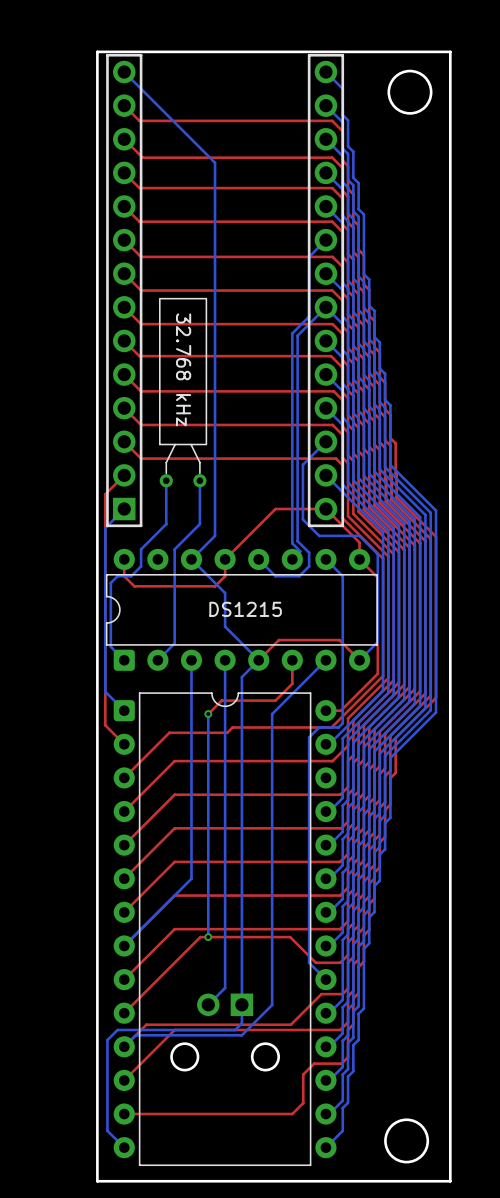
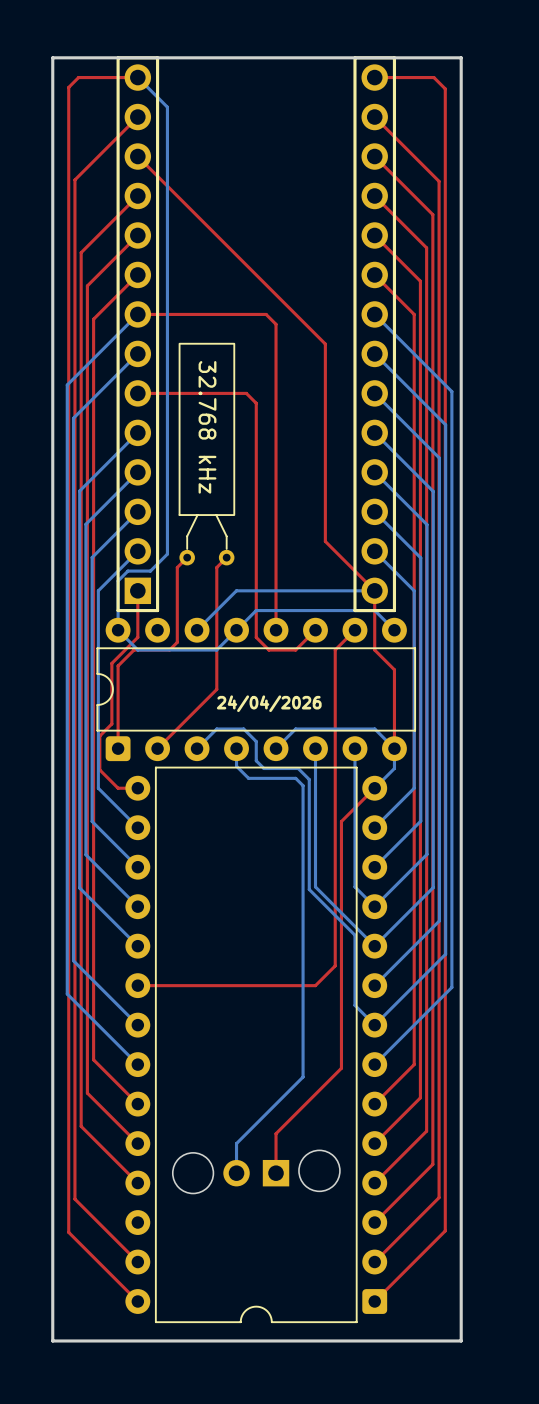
board edge: (450, 51) (97, 51) (97, 1181) (450, 1181) (450, 51) -> (461, 57) (461, 1340) (52, 1340) (52, 57) (461, 57)
round board edge: [387, 69, 433, 115] -> none
bottom track: (325, 72) (342, 88) (342, 114) (348, 120) (348, 146) (353, 151) (353, 177) (358, 183) (358, 209) (363, 214) (363, 274) (369, 279) (369, 305) (374, 310) (374, 337) (379, 342) (379, 368) (385, 373) (385, 399) (390, 405) (390, 464) (436, 510) (436, 712) (390, 758) (390, 817) (385, 823) (385, 849) (379, 854) (379, 880) (374, 885) (374, 912) (369, 917) (369, 943) (363, 948) (363, 1008) (358, 1013) (358, 1039) (353, 1045) (353, 1071) (348, 1076) (348, 1102) (342, 1108) (342, 1130) (325, 1147) -> none
top track: none -> (374, 77) (433, 77) (445, 88) (445, 555)
bottom track: (149, 97) (215, 162) (215, 535) (191, 559) (225, 593) (225, 626) (258, 660) (241, 677) (241, 1023) (235, 1030) (117, 1030) (107, 1040) (107, 1130) (124, 1147) -> (167, 107) (167, 554) (150, 571) (127, 571) (118, 580) (118, 630) (137, 650) (216, 650) (256, 610) (374, 610) (394, 630)
top track: (124, 105) (139, 120) (332, 120) (342, 131) (342, 160) (348, 165) (348, 188) (353, 194) (353, 220) (358, 225) (358, 249) (363, 255) (363, 284) (369, 289) (369, 315) (374, 321) (374, 347) (379, 352) (379, 377) (385, 382) (385, 409) (390, 414) (390, 438) (395, 443) (396, 497) (436, 536) (436, 697) (395, 738) (395, 772) (390, 778) (390, 804) (385, 809) (385, 837) (379, 842) (379, 867) (374, 872) (374, 898) (369, 903) (369, 930) (363, 935) (363, 961) (358, 966) (358, 993) (353, 998) (353, 1024) (348, 1029) (348, 1057) (341, 1063) (314, 1063) (303, 1074) (303, 1103) (292, 1114) (124, 1114) -> (137, 77) (78, 77) (68, 87) (68, 1232) (137, 1301)
bottom track: (325, 105) (342, 122) (342, 148) (348, 153) (348, 180) (353, 185) (353, 211) (358, 216) (358, 276) (363, 281) (363, 307) (369, 313) (369, 339) (374, 344) (374, 370) (379, 376) (379, 402) (385, 407) (385, 467) (430, 512) (430, 710) (385, 755) (385, 815) (379, 820) (379, 847) (374, 852) (374, 878) (369, 883) (369, 909) (363, 915) (363, 941) (358, 946) (358, 1006) (353, 1011) (353, 1037) (348, 1043) (348, 1069) (342, 1074) (342, 1100) (329, 1114) -> none
top track: none -> (374, 117) (439, 181) (439, 1197) (374, 1262)
bottom track: (325, 139) (342, 156) (342, 182) (348, 187) (348, 213) (353, 218) (353, 278) (358, 283) (358, 310) (363, 315) (363, 341) (369, 346) (369, 372) (374, 378) (374, 404) (379, 409) (379, 469) (425, 515) (425, 708) (379, 753) (379, 813) (374, 818) (374, 844) (369, 850) (369, 876) (363, 881) (363, 907) (358, 912) (358, 939) (353, 944) (353, 1004) (348, 1009) (348, 1035) (342, 1040) (342, 1066) (329, 1080) -> none
top track: none -> (374, 156) (432, 214) (432, 1164) (374, 1222)
top track: (142, 157) (332, 157) (342, 168) (342, 191) (348, 196) (348, 222) (353, 227) (353, 252) (358, 257) (358, 286) (363, 292) (363, 317) (369, 323) (369, 349) (374, 354) (374, 379) (379, 384) (379, 411) (385, 416) (385, 440) (390, 445) (391, 499) (430, 538) (430, 695) (390, 736) (390, 770) (385, 776) (385, 802) (379, 807) (379, 834) (374, 840) (374, 865) (369, 870) (369, 896) (363, 901) (363, 927) (358, 933) (358, 959) (353, 964) (353, 990) (348, 996) (348, 1022) (340, 1030) (174, 1030) (124, 1080) -> (137, 117) (74, 179) (74, 1199) (137, 1262)
top track: none -> (159, 178) (325, 344) (325, 541) (374, 590) (374, 650) (394, 669) (394, 748)
top track: (124, 172) (139, 188) (332, 188) (342, 198) (342, 224) (348, 230) (348, 254) (353, 259) (353, 288) (358, 294) (358, 320) (363, 325) (363, 351) (369, 356) (369, 381) (374, 387) (374, 413) (379, 419) (379, 442) (385, 447) (386, 479) -> none
bottom track: (325, 172) (342, 189) (342, 215) (348, 221) (348, 280) (353, 286) (353, 312) (358, 317) (358, 343) (363, 348) (363, 375) (369, 380) (369, 406) (374, 411) (374, 471) (420, 517) (420, 705) (374, 751) (374, 811) (369, 816) (369, 842) (363, 847) (363, 874) (358, 879) (358, 905) (353, 910) (353, 936) (348, 942) (348, 1001) (342, 1007) (342, 1033) (329, 1046) -> none
top track: none -> (374, 196) (426, 247) (426, 1131) (374, 1183)
top track: (124, 206) (139, 221) (332, 221) (342, 232) (342, 256) -> (374, 274) (394, 294)
bottom track: (325, 206) (342, 223) (342, 283) (348, 288) (348, 314) (353, 319) (353, 345) (358, 351) (358, 377) (363, 382) (363, 408) (369, 414) (369, 473) (414, 519) (414, 703) (369, 749) (369, 809) (363, 814) (363, 840) (358, 845) (358, 871) (353, 877) (353, 903) (348, 908) (348, 934) (342, 940) (342, 999) (329, 1013) -> none
top track: none -> (374, 235) (420, 281) (420, 1097) (374, 1143)
top track: (124, 240) (141, 256) (332, 256) (342, 267) (342, 293) (348, 298) (348, 324) (353, 329) (353, 355) (358, 361) (358, 386) (363, 391) (363, 418) (369, 423) (369, 446) (374, 452) (374, 505) (414, 545) (414, 689) (374, 729) (374, 764) (369, 769) (369, 795) (363, 801) (363, 828) (358, 833) (358, 858) (353, 863) (353, 889) (348, 895) (348, 921) (340, 929) (174, 929) (124, 979) -> (137, 235) (87, 285) (87, 1093) (137, 1143)
bottom track: (325, 240) (309, 256) (309, 316) (292, 333) (292, 543) (300, 551) (292, 559) -> none
top track: (348, 262) (348, 291) (353, 296) (353, 322) (358, 327) (358, 353) (363, 359) (363, 384) (369, 389) (369, 416) (374, 421) (374, 444) (379, 449) (379, 502) (420, 543) (420, 691) (379, 731) (379, 766) (374, 771) (374, 798) (369, 803) (369, 830) (363, 835) (363, 860) (358, 865) (358, 892) (353, 897) (353, 923) (348, 928) (348, 955) (340, 962) (315, 962) (290, 937) (200, 937) (124, 1013) -> (137, 196) (81, 252) (81, 1126) (137, 1183)
bottom track: none -> (137, 314) (67, 385) (67, 994) (137, 1064)
top track: (124, 273) (141, 290) (332, 290) (342, 300) (342, 326) (348, 332) (348, 358) (353, 363) (353, 388) (358, 393) (358, 420) (363, 425) (363, 449) (369, 454) (369, 507) (409, 547) (409, 686) (369, 727) (369, 761) (363, 767) (363, 793) (358, 798) (358, 826) (353, 831) (353, 856) (348, 861) (348, 887) (340, 895) (174, 895) (124, 945) -> (137, 274) (93, 319) (93, 1059) (137, 1104)
top track: none -> (137, 314) (266, 314) (276, 324) (276, 630)
bottom track: (342, 290) (342, 316) (348, 321) (348, 348) (353, 353) (353, 379) (358, 384) (358, 410) (363, 416) (363, 475) (409, 521) (409, 701) (363, 747) (363, 806) (358, 812) (358, 838) (353, 843) (353, 869) (348, 874) (348, 901) (342, 906) (342, 932) (329, 945) -> (394, 334) (451, 391) (451, 987) (374, 1064)
bottom track: none -> (137, 353) (73, 418) (73, 960) (137, 1025)
top track: (124, 307) (141, 324) (332, 324) (342, 334) (342, 360) (348, 365) (348, 390) (353, 395) (353, 422) (358, 427) (358, 451) (363, 456) (363, 509) (404, 549) (404, 684) (363, 725) (363, 759) (358, 765) (358, 791) (353, 796) (353, 823) (348, 829) (348, 854) (340, 861) (174, 861) (124, 912) -> none
bottom track: (325, 307) (297, 335) (297, 541) (309, 552) (309, 566) (299, 576) (275, 576) (258, 559) -> none
bottom track: (342, 324) (342, 350) (348, 355) (348, 381) (353, 386) (353, 413) (358, 418) (358, 478) (404, 523) (404, 699) (358, 744) (358, 804) (353, 809) (353, 836) (348, 841) (348, 867) (342, 872) (342, 898) (329, 912) -> (394, 373) (445, 424) (445, 954) (374, 1025) (354, 1005)
top track: (124, 340) (139, 356) (331, 356) (342, 367) (342, 392) (348, 398) (348, 424) (353, 430) (353, 453) (358, 458) (358, 511) (398, 552) (398, 682) (358, 722) (358, 757) (353, 762) (353, 789) (348, 794) (348, 821) (341, 828) (174, 828) (124, 878) -> (137, 393) (246, 393) (256, 403) (256, 637) (268, 650) (295, 650) (315, 630)
bottom track: (342, 357) (342, 383) (348, 389) (348, 415) (353, 420) (353, 480) (398, 525) (398, 697) (353, 742) (353, 802) (348, 807) (348, 833) (342, 839) (342, 865) (329, 878) -> (394, 413) (439, 458) (439, 920) (374, 985)
bottom track: none -> (137, 432) (79, 491) (79, 888) (137, 946)
top track: (124, 374) (141, 391) (333, 391) (342, 400) (342, 426) (348, 432) (348, 455) (353, 460) (353, 513) (393, 554) (393, 680) (353, 720) (353, 755) (348, 760) (348, 787) (340, 794) (174, 794) (124, 845) -> none
bottom track: (342, 391) (342, 417) (348, 422) (348, 482) (393, 528) (393, 694) (348, 740) (348, 800) (342, 805) (342, 831) (329, 845) -> (394, 452) (433, 491) (433, 887) (374, 946) (315, 886) (315, 748)
bottom track: none -> (137, 472) (85, 524) (85, 854) (137, 906)
top track: (124, 408) (141, 424) (332, 424) (342, 435) (342, 457) (348, 463) (348, 516) (388, 556) (388, 678) (348, 718) (348, 745) (332, 761) (174, 761) (124, 811) -> none
bottom track: (342, 424) (342, 484) (388, 530) (388, 692) (342, 738) (342, 798) (329, 811) -> (394, 492) (427, 524) (427, 854) (374, 906) (354, 886)
bottom track: none -> (137, 511) (92, 557) (92, 821) (137, 867)
top track: (124, 441) (141, 458) (336, 458) (342, 465) (342, 518) (383, 558) (383, 676) (331, 727) (232, 727) (227, 732) (169, 732) (124, 777) -> none
bottom track: (325, 441) (302, 464) (302, 519) (319, 535) (359, 535) (377, 554) (377, 642) (359, 660) -> (374, 511) (420, 557) (420, 821) (374, 867)
top track: (124, 475) (105, 494) (105, 725) (124, 744) -> none
bottom track: (166, 480) (166, 524) (141, 549) (141, 566) (131, 576) (117, 576) (110, 582) (110, 646) (124, 660) -> none
top track: none -> (187, 557) (177, 567) (177, 642) (169, 650) (133, 650) (118, 665) (118, 748)
bottom track: (199, 480) (199, 524) (174, 549) (174, 643) (157, 660) -> none
top track: none -> (226, 557) (216, 567) (216, 689) (157, 748)
top track: (386, 501) (425, 541) (425, 693) (385, 733) (385, 768) (379, 773) (379, 800) (374, 805) (374, 832) (369, 837) (369, 862) (363, 868) (363, 894) (358, 899) (358, 925) (353, 930) (353, 957) (348, 962) (348, 988) (342, 994) (321, 994) (290, 1024) (146, 1024) (124, 1046) -> (445, 582) (445, 1230) (374, 1301)
bottom track: (124, 509) (105, 527) (105, 691) -> (137, 551) (98, 590) (98, 788) (115, 805)
top track: none -> (137, 590) (137, 637) (111, 663) (111, 723) (99, 736) (99, 769) (118, 788) (137, 788)
bottom track: none -> (374, 590) (236, 590) (197, 630)
bottom track: (359, 509) (383, 532) (383, 690) (329, 744) -> (414, 590) (414, 788) (374, 827)
top track: none -> (354, 630) (335, 649) (335, 768)
top track: (359, 542) (325, 509) (275, 509) (225, 559) (225, 576) (215, 586) (134, 586) (124, 576) (124, 559) -> (414, 630) (414, 314) (400, 300)
bottom track: (325, 559) (342, 576) (342, 643) -> (276, 748) (295, 729) (374, 729) (394, 748)
top track: (359, 559) (377, 577) (377, 673) (340, 710) (325, 710) -> (414, 650) (414, 1064) (374, 1104)
part: none -> (256, 689)
text: none -> 24/04/2026 (269, 703)
DS1215: (241, 609) -> none
bottom track: (191, 660) (191, 878) (124, 945) -> none
bottom track: (225, 660) (225, 987) (208, 1004) -> (236, 748) (236, 766) (248, 778) (295, 778) (303, 785) (303, 1077) (236, 1143) (236, 1173)
bottom track: (325, 660) (272, 714) (272, 1004) (241, 1035) (135, 1035) (124, 1046) -> none
bottom track: (342, 660) (342, 723) (338, 727) (319, 727) (309, 737) -> (354, 748) (354, 859)
bottom track: none -> (394, 768) (374, 788)
top track: (359, 660) (339, 640) (278, 640) (258, 660) -> none
top track: none -> (374, 788) (341, 821) (341, 1068) (276, 1133) (276, 1173)
top track: (292, 683) (275, 700) (221, 700) (208, 714) -> (335, 796) (335, 965) (315, 985) (137, 985)
bottom track: (208, 714) (208, 937) -> none
via: (208, 714) -> none
bottom track: (309, 761) (309, 802) -> (197, 748) (216, 729) (243, 729) (256, 741) (256, 760) (263, 768) (298, 768) (309, 779) (309, 889) (354, 935)
bottom track: (309, 861) (309, 962) (325, 979) -> none
part rotation: 0° (225, 929) -> 180° (256, 1044)
via: (208, 937) -> none
round board edge: none -> [298, 1149, 341, 1192]
round board edge: none -> [172, 1152, 214, 1194]
round board edge: [170, 1042, 200, 1072] -> none
round board edge: [250, 1042, 281, 1072] -> none
round board edge: [384, 1118, 430, 1164] -> none

